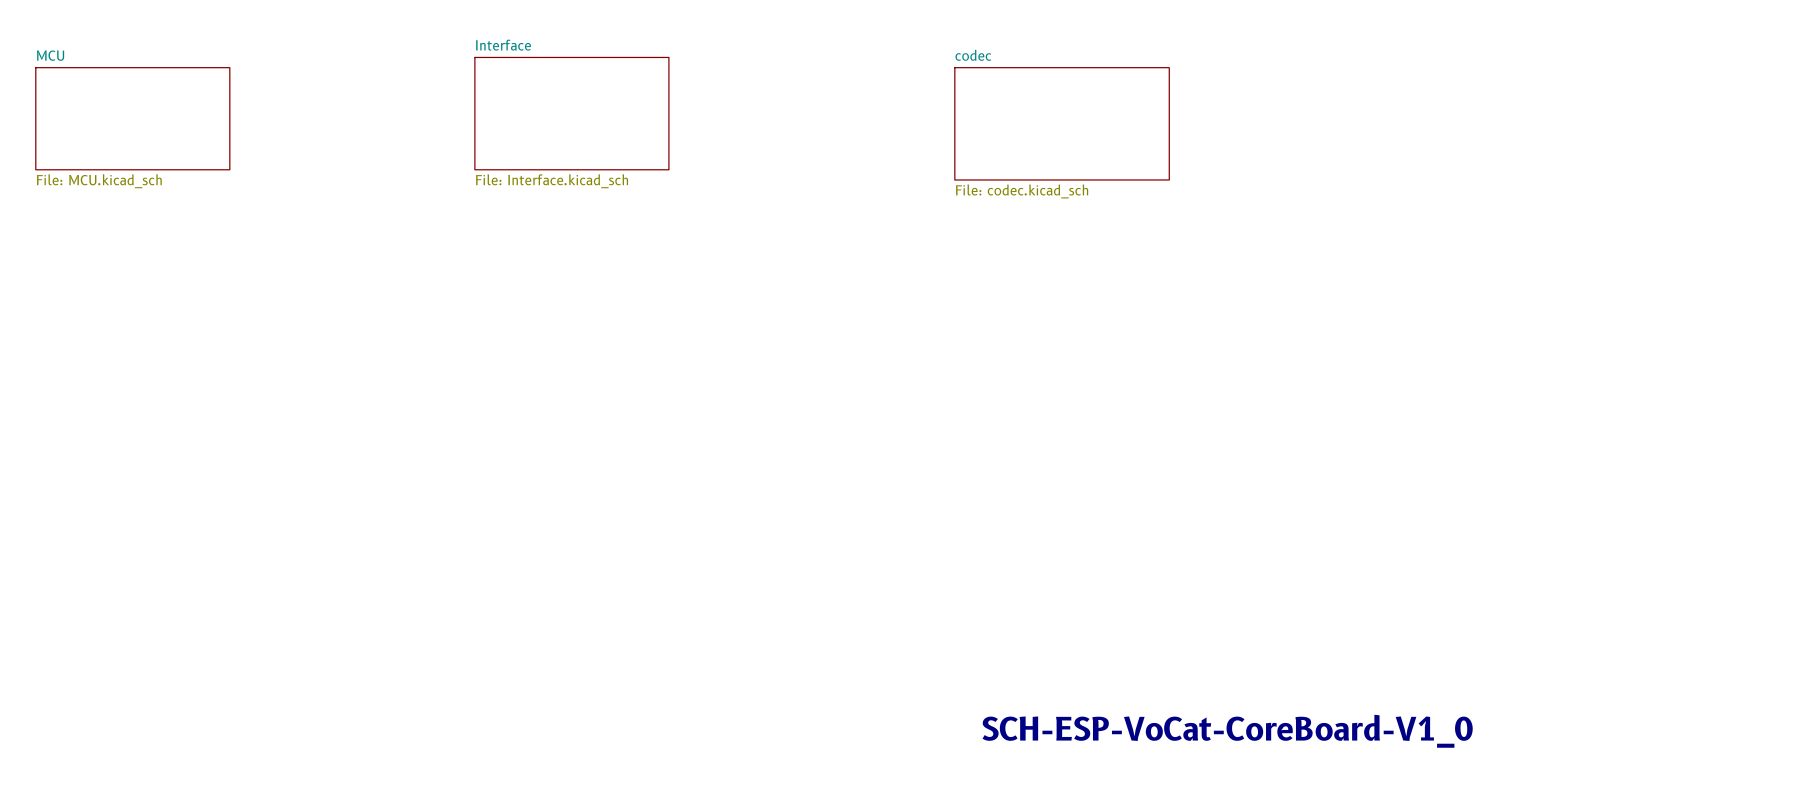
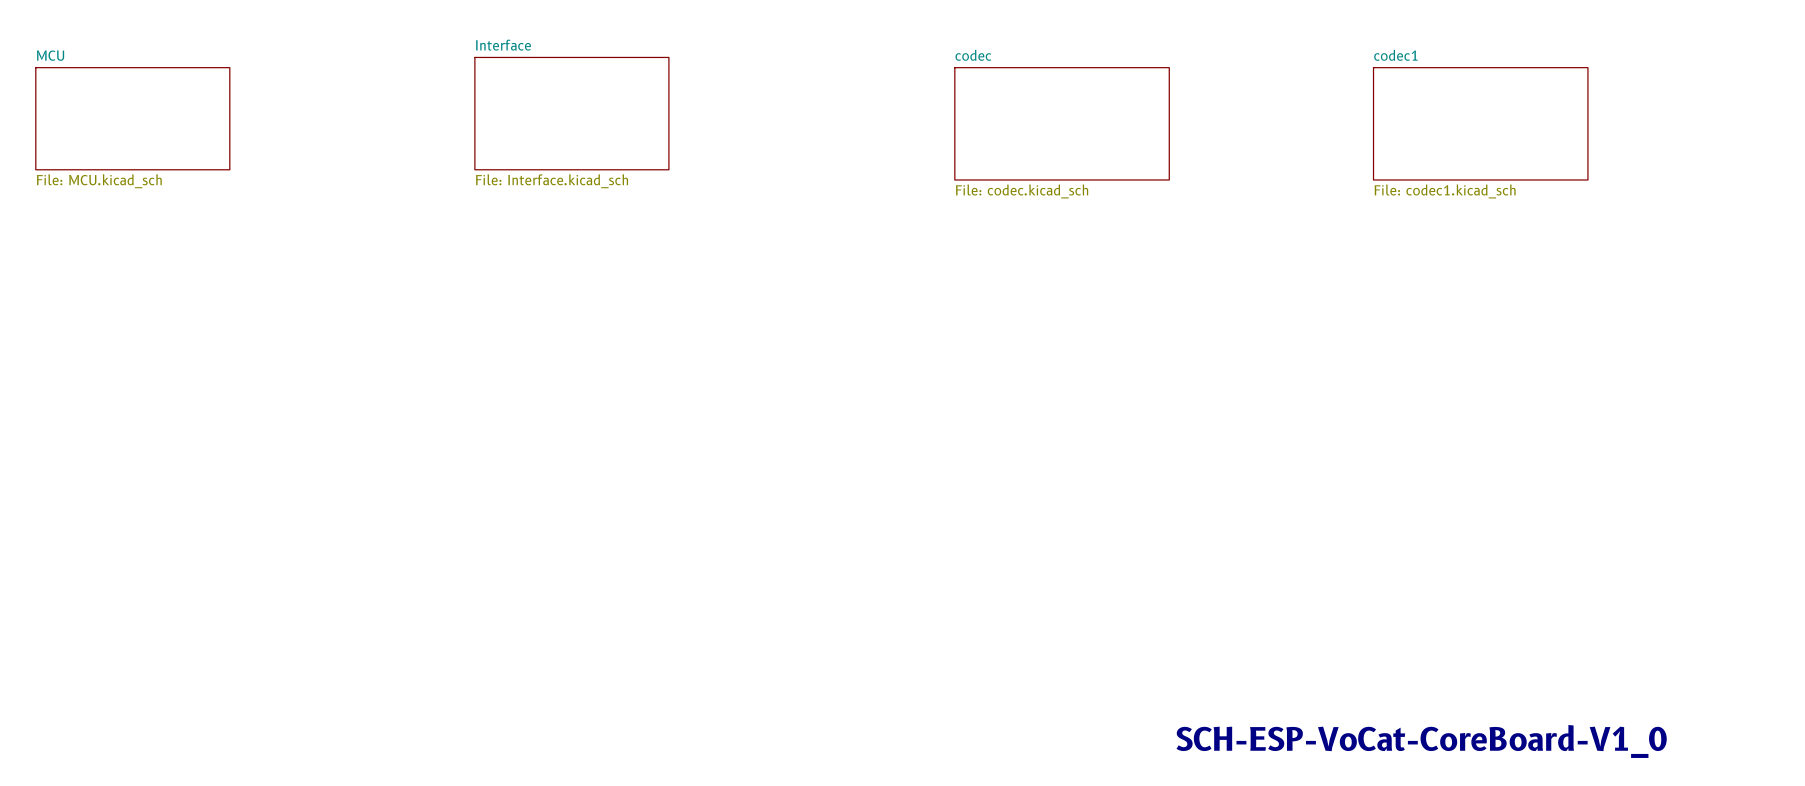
sheet codec1: none -> File: codec1.kicad_sch (1480, 123)
text position: SCH-ESP-VoCat-CoreBoard-V1_0 (1227, 731) -> SCH-ESP-VoCat-CoreBoard-V1_0 (1421, 741)

